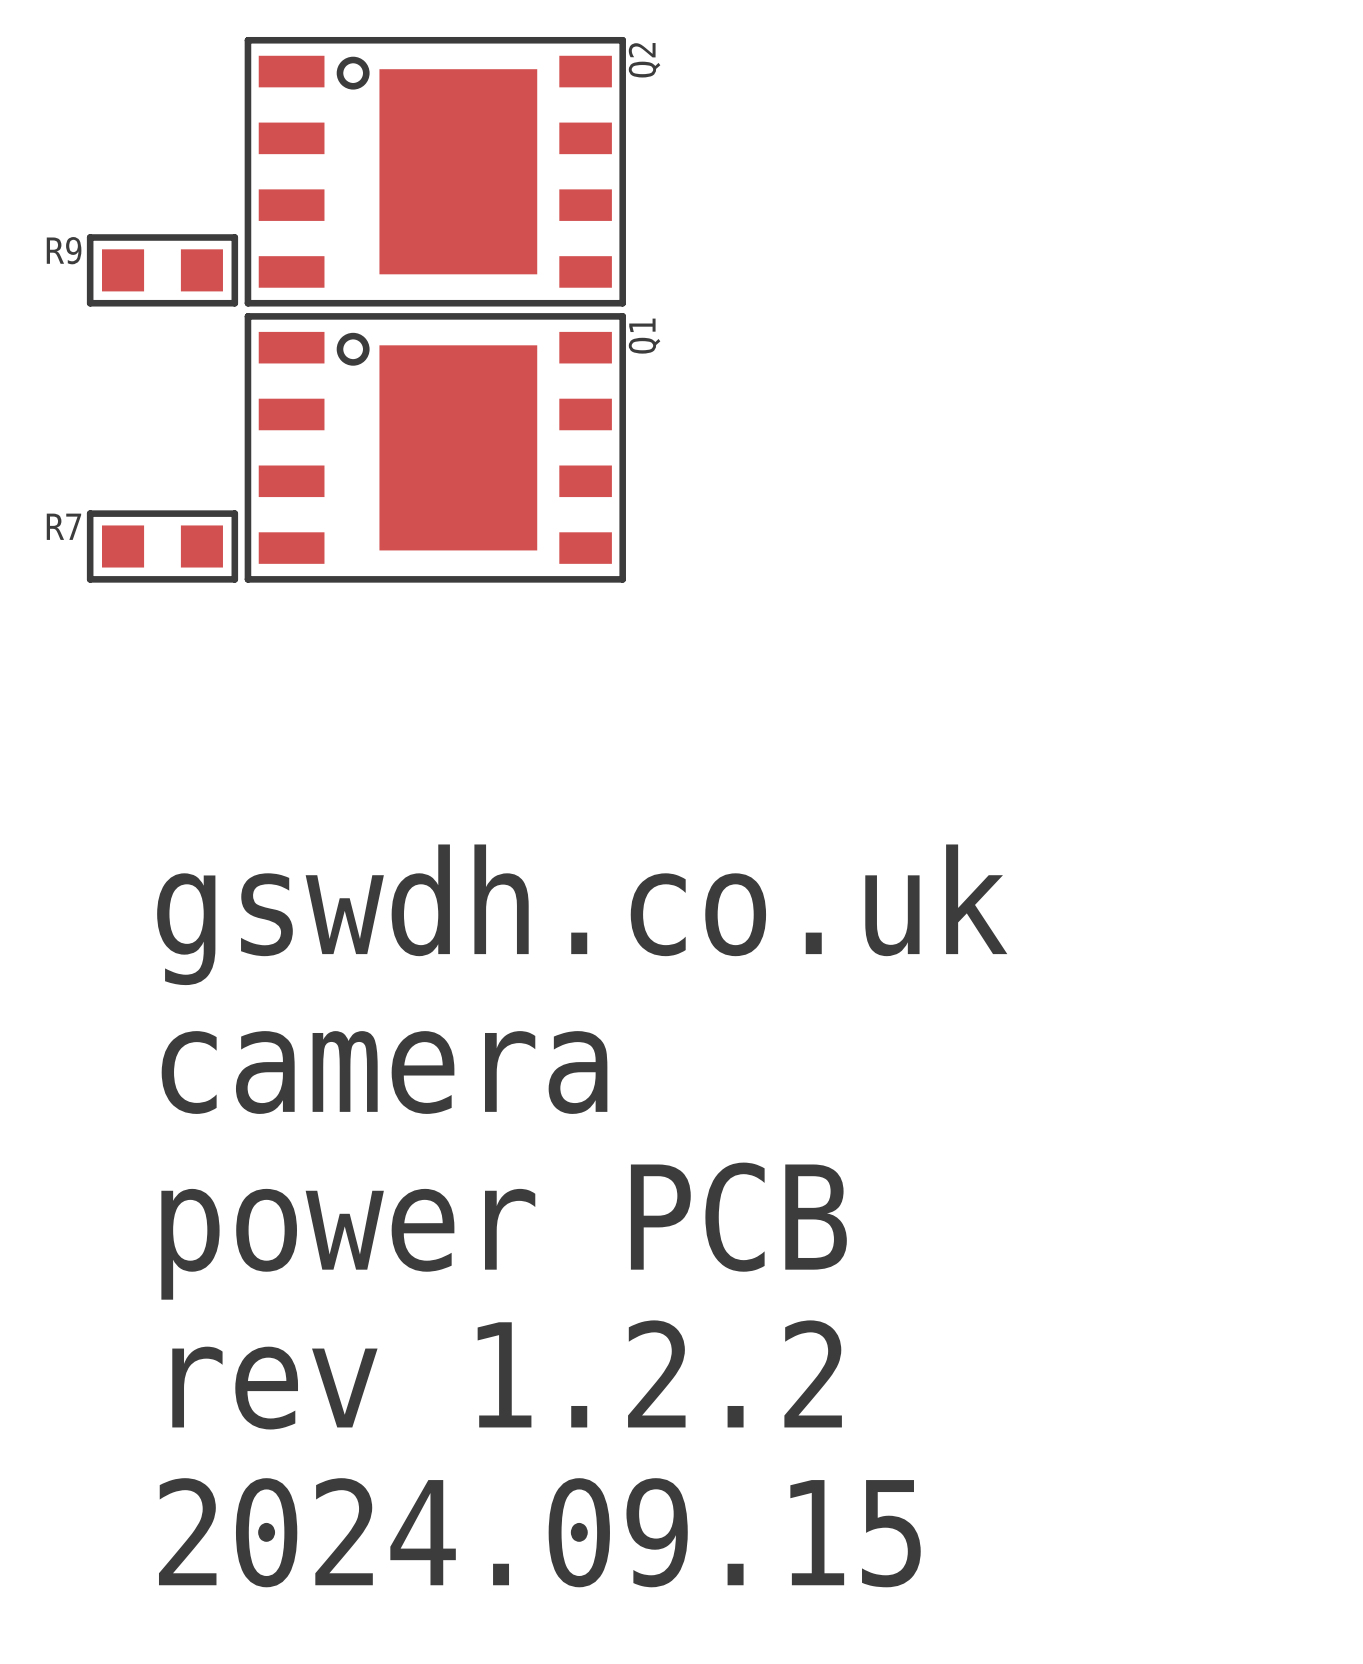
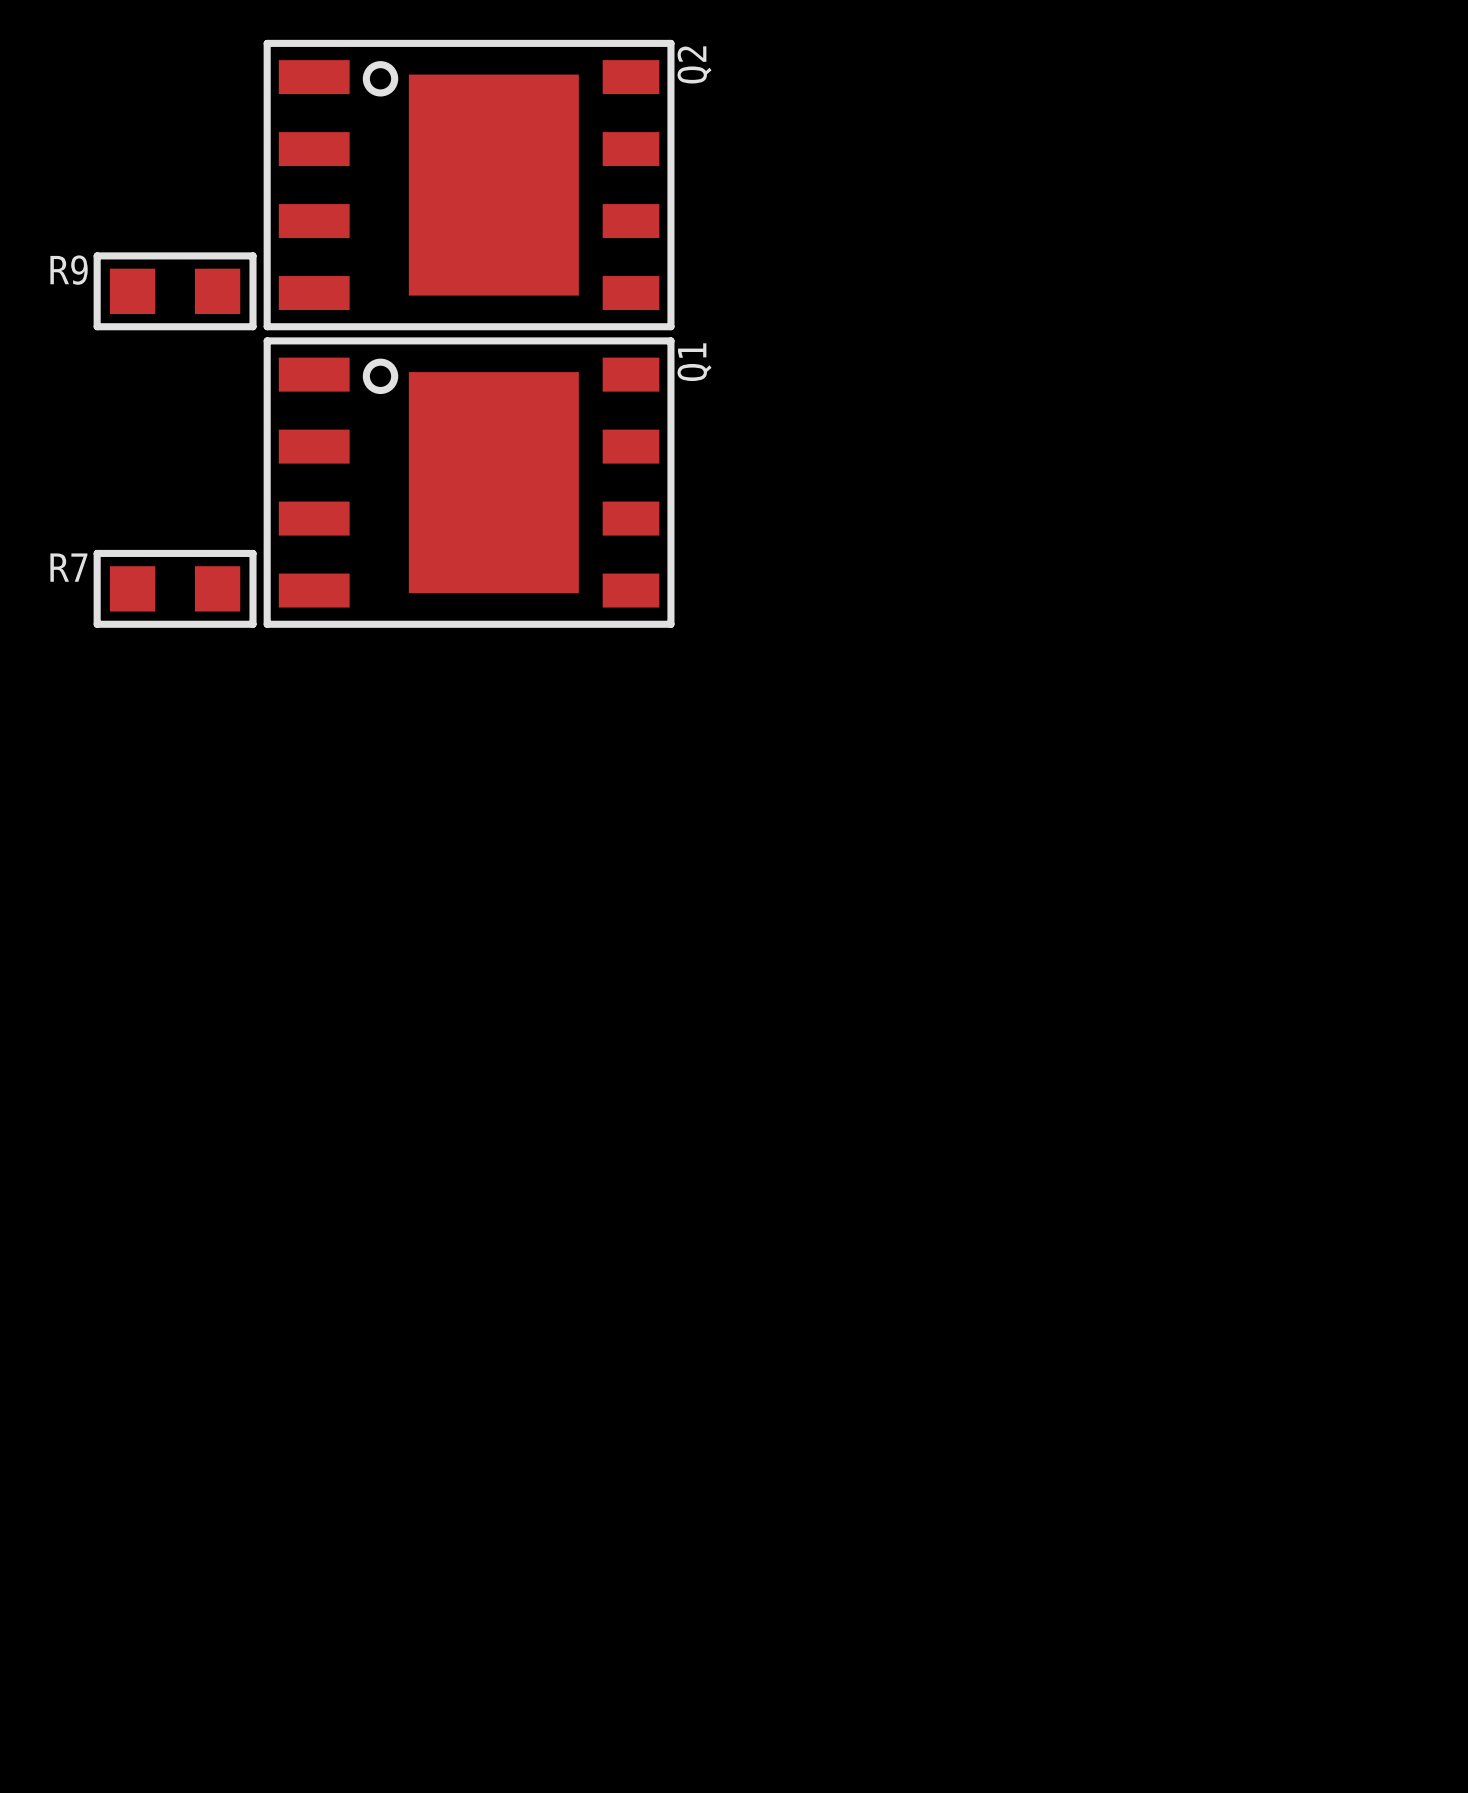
text: gswdh.co.uk (582, 914) -> none
text: camera (384, 1072) -> none
text: power PCB (504, 1231) -> none
text: rev 1.2.2 (507, 1374) -> none
text: 2024.09.15 (539, 1532) -> none

